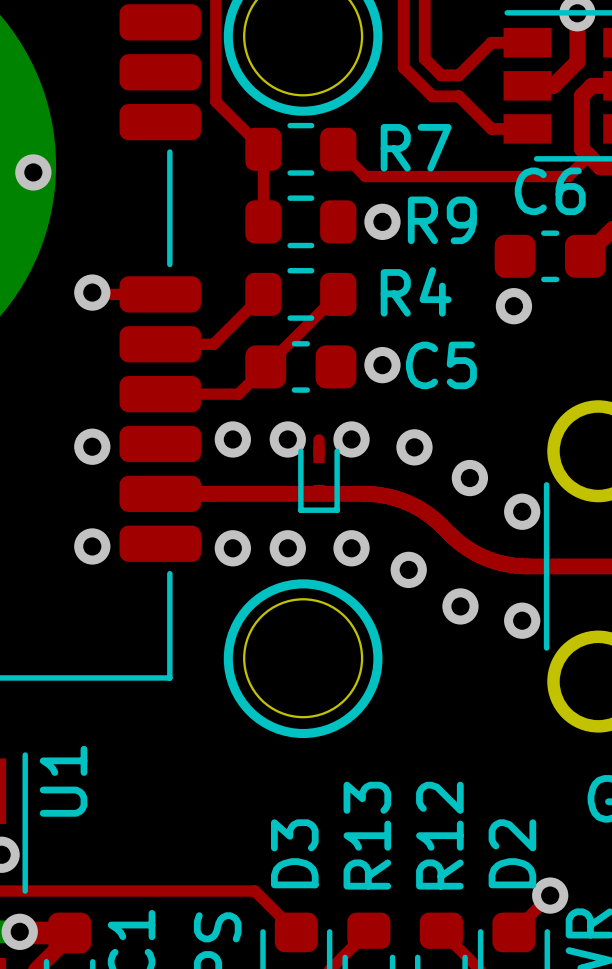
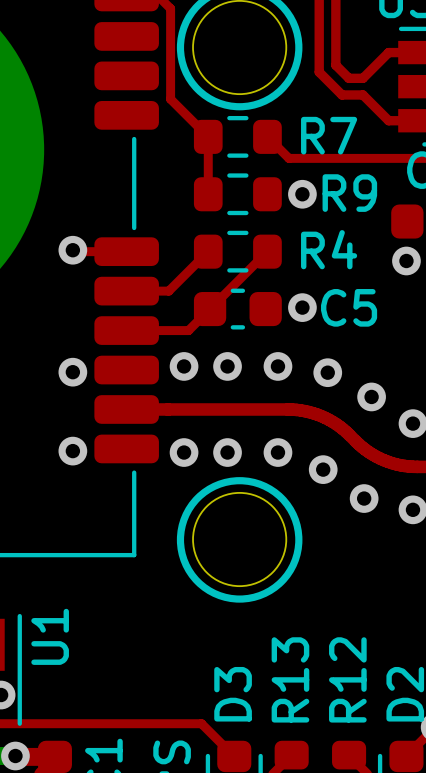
via: (33, 172) -> none
top track: (318, 439) (318, 454) -> none
part: (318, 479) -> none

